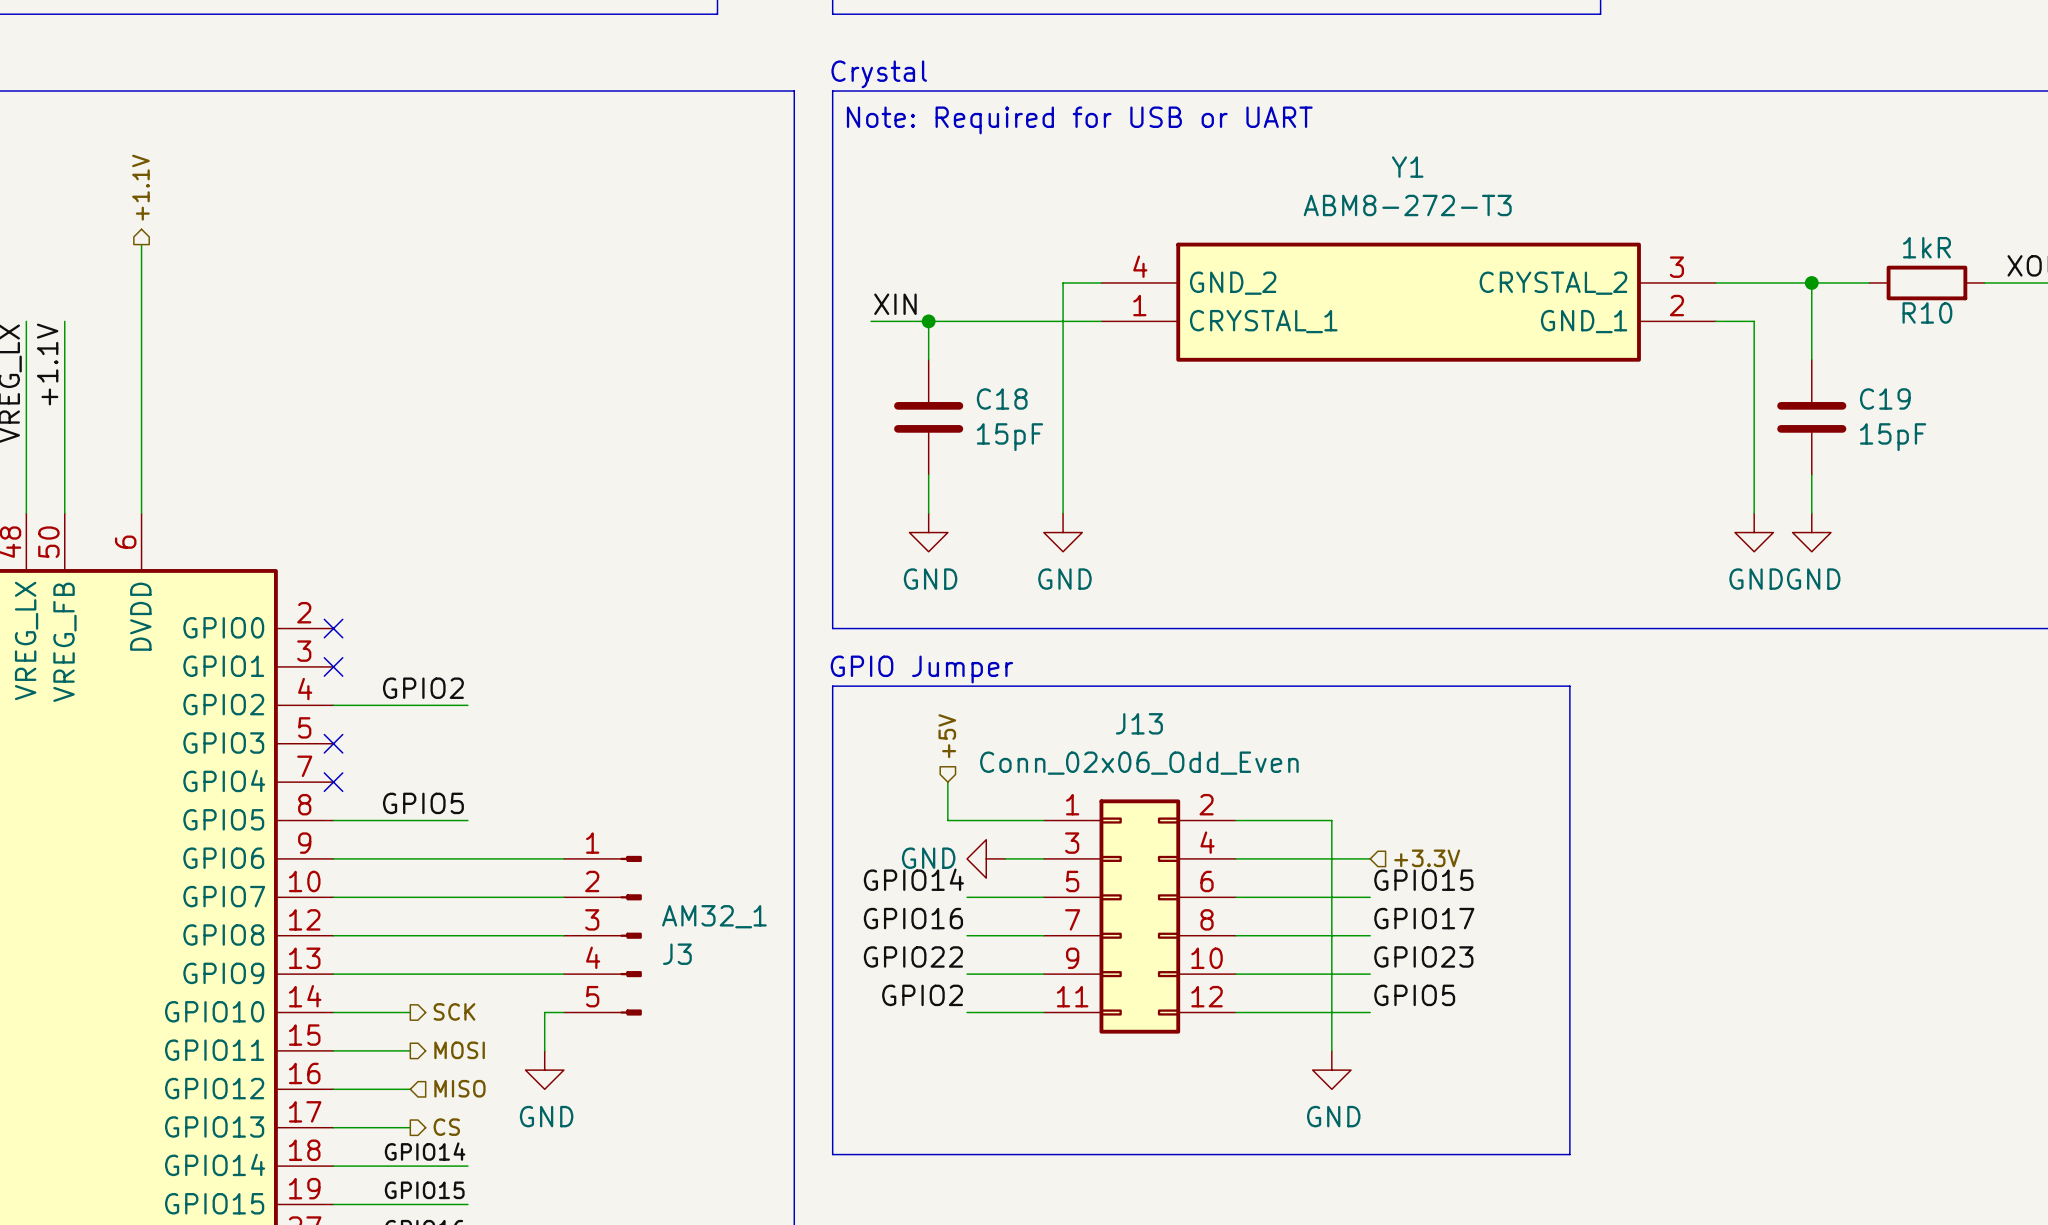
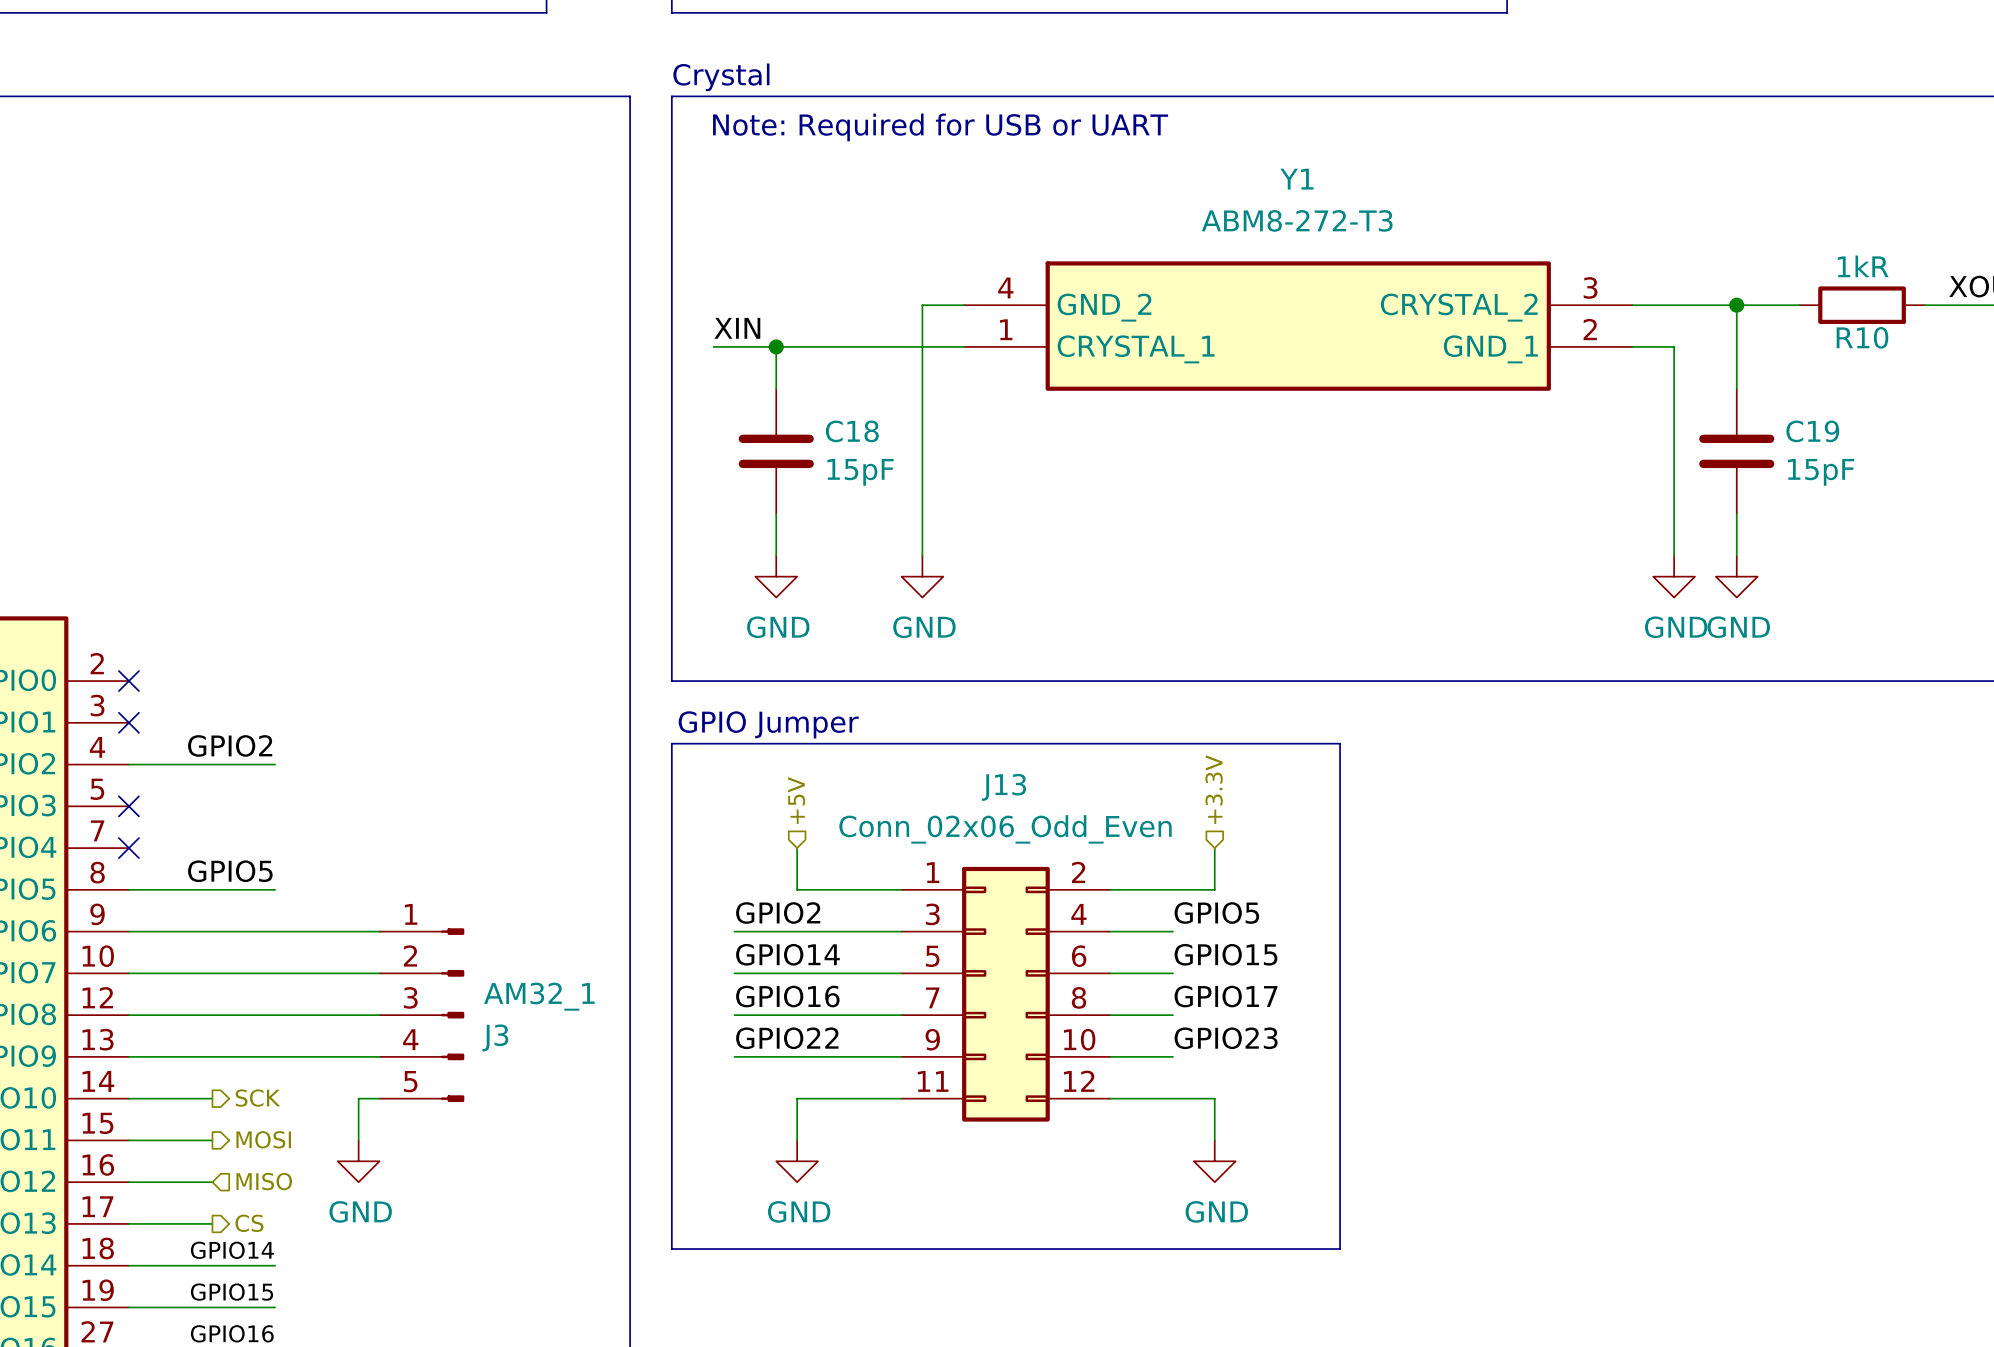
line: (1447, 686) (1569, 686) (1569, 1154) (832, 1154) (832, 1150) -> (1340, 743) (1340, 1249) (671, 1249)
wire: (1331, 820) (1331, 1012) (1370, 1012) -> (1214, 889) (1214, 848)
wire: none -> (734, 931) (859, 931)
power symbol rotation: 0° (986, 858) -> 90° counterclockwise (797, 1161)
power symbol position: GND (986, 858) -> GND (797, 1161)
wire: (1293, 858) (1370, 858) -> none
hierarchical label rotation: 0° (1427, 858) -> 90° counterclockwise (1214, 789)
hierarchical label position: +3.3V (1427, 858) -> +3.3V (1214, 789)
label position: GPIO14 (913, 879) -> GPIO14 (787, 954)
label position: GPIO15 (1423, 880) -> GPIO15 (1225, 954)
wire: none -> (734, 973) (818, 973)
wire: (1293, 897) (1370, 897) -> none
label position: GPIO16 (913, 918) -> GPIO16 (787, 996)
label position: GPIO17 (1424, 918) -> GPIO17 (1226, 996)
wire: none -> (734, 1015) (818, 1015)
wire: (1293, 935) (1370, 935) -> none
label position: GPIO22 (913, 956) -> GPIO22 (787, 1038)
label position: GPIO23 (1423, 956) -> GPIO23 (1226, 1038)
wire: none -> (734, 1056) (818, 1056)
wire: (1293, 974) (1370, 974) -> none
label position: GPIO2 (922, 995) -> GPIO2 (778, 913)
label position: GPIO5 (1414, 995) -> GPIO5 (1216, 913)
wire: none -> (818, 1098) (797, 1098) (797, 1140)

